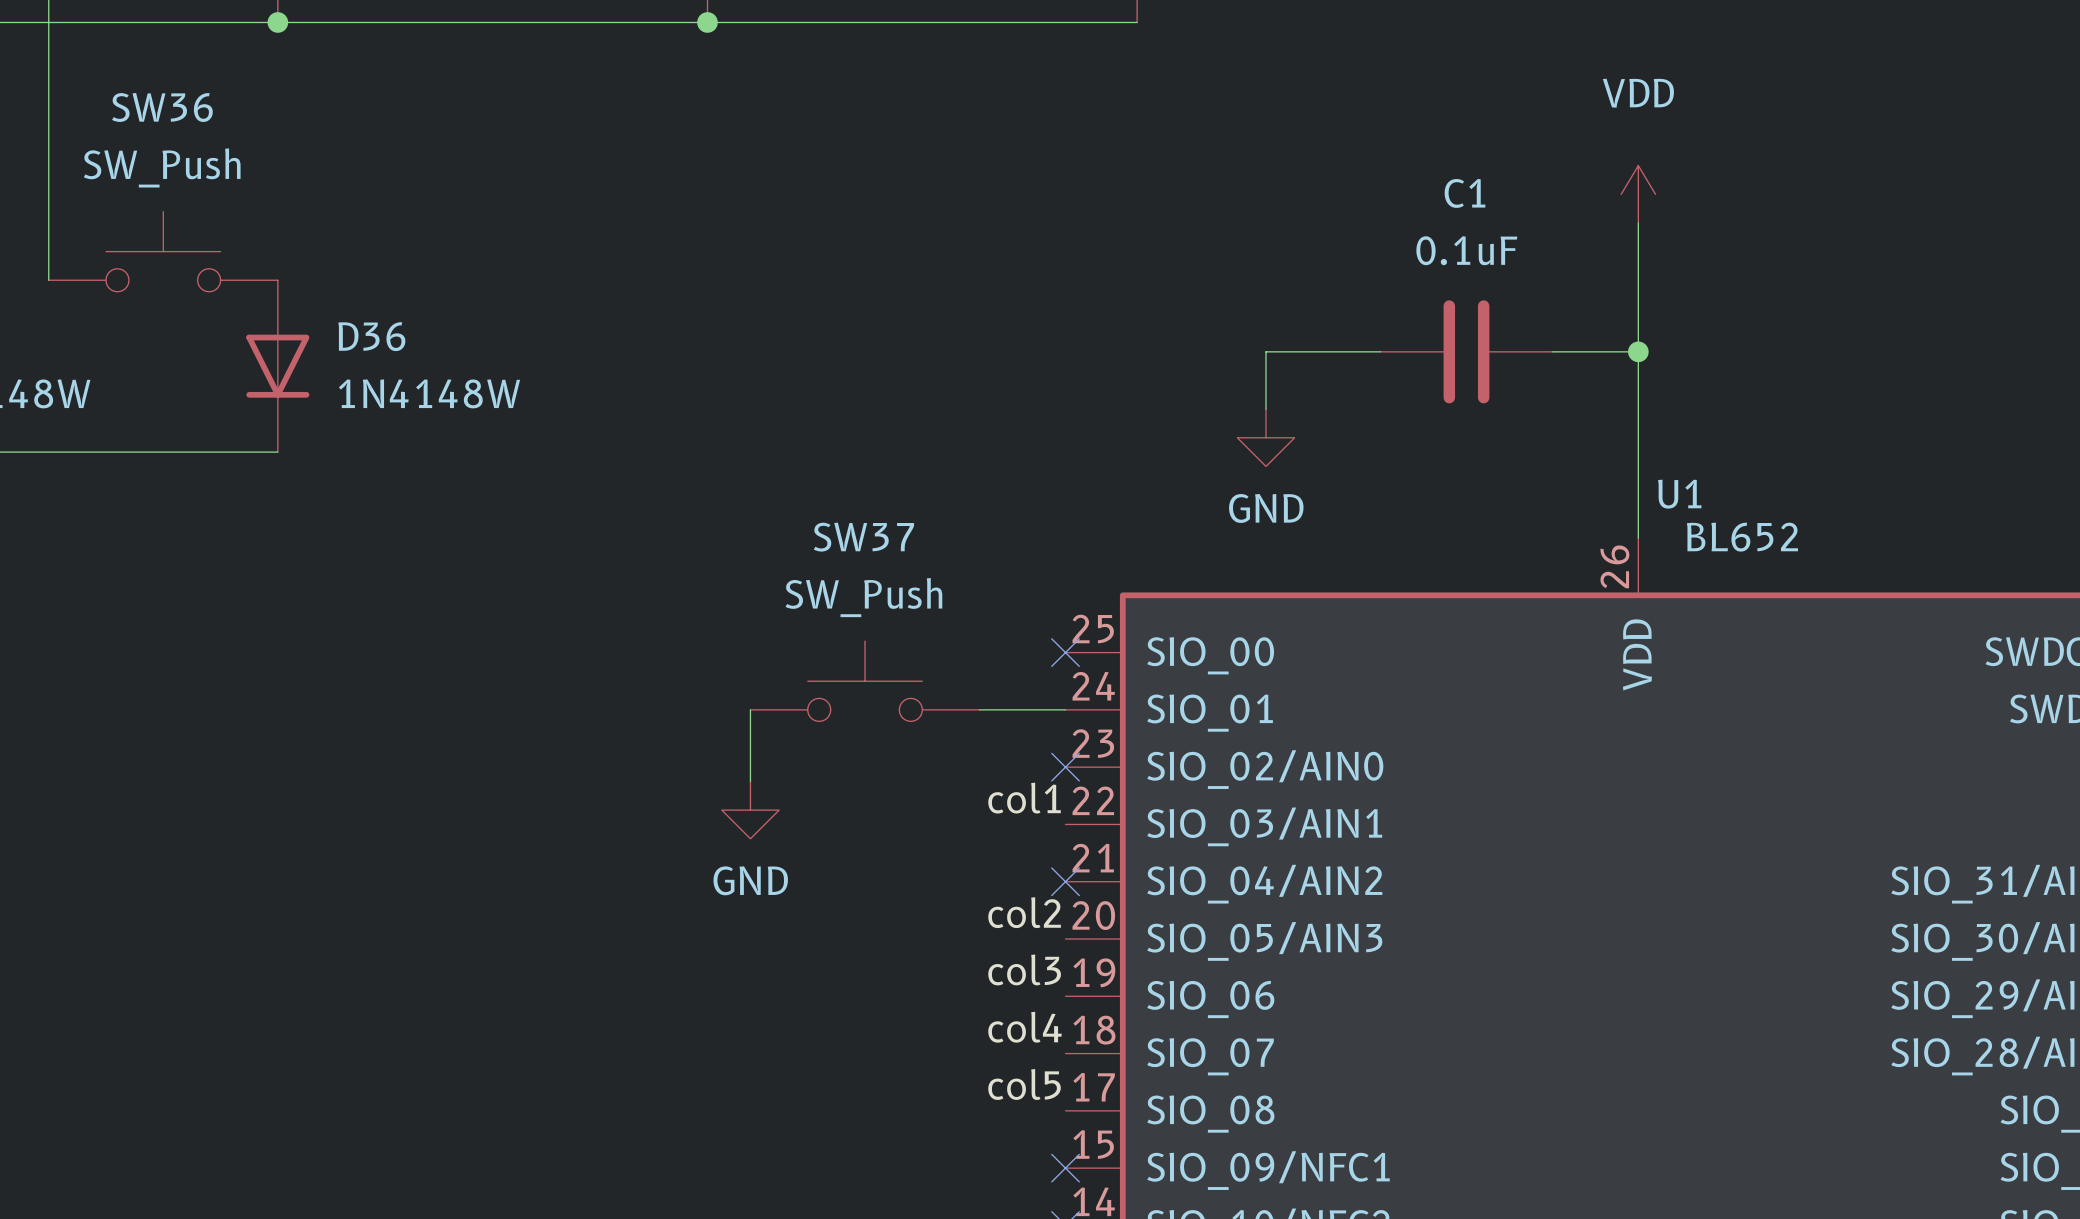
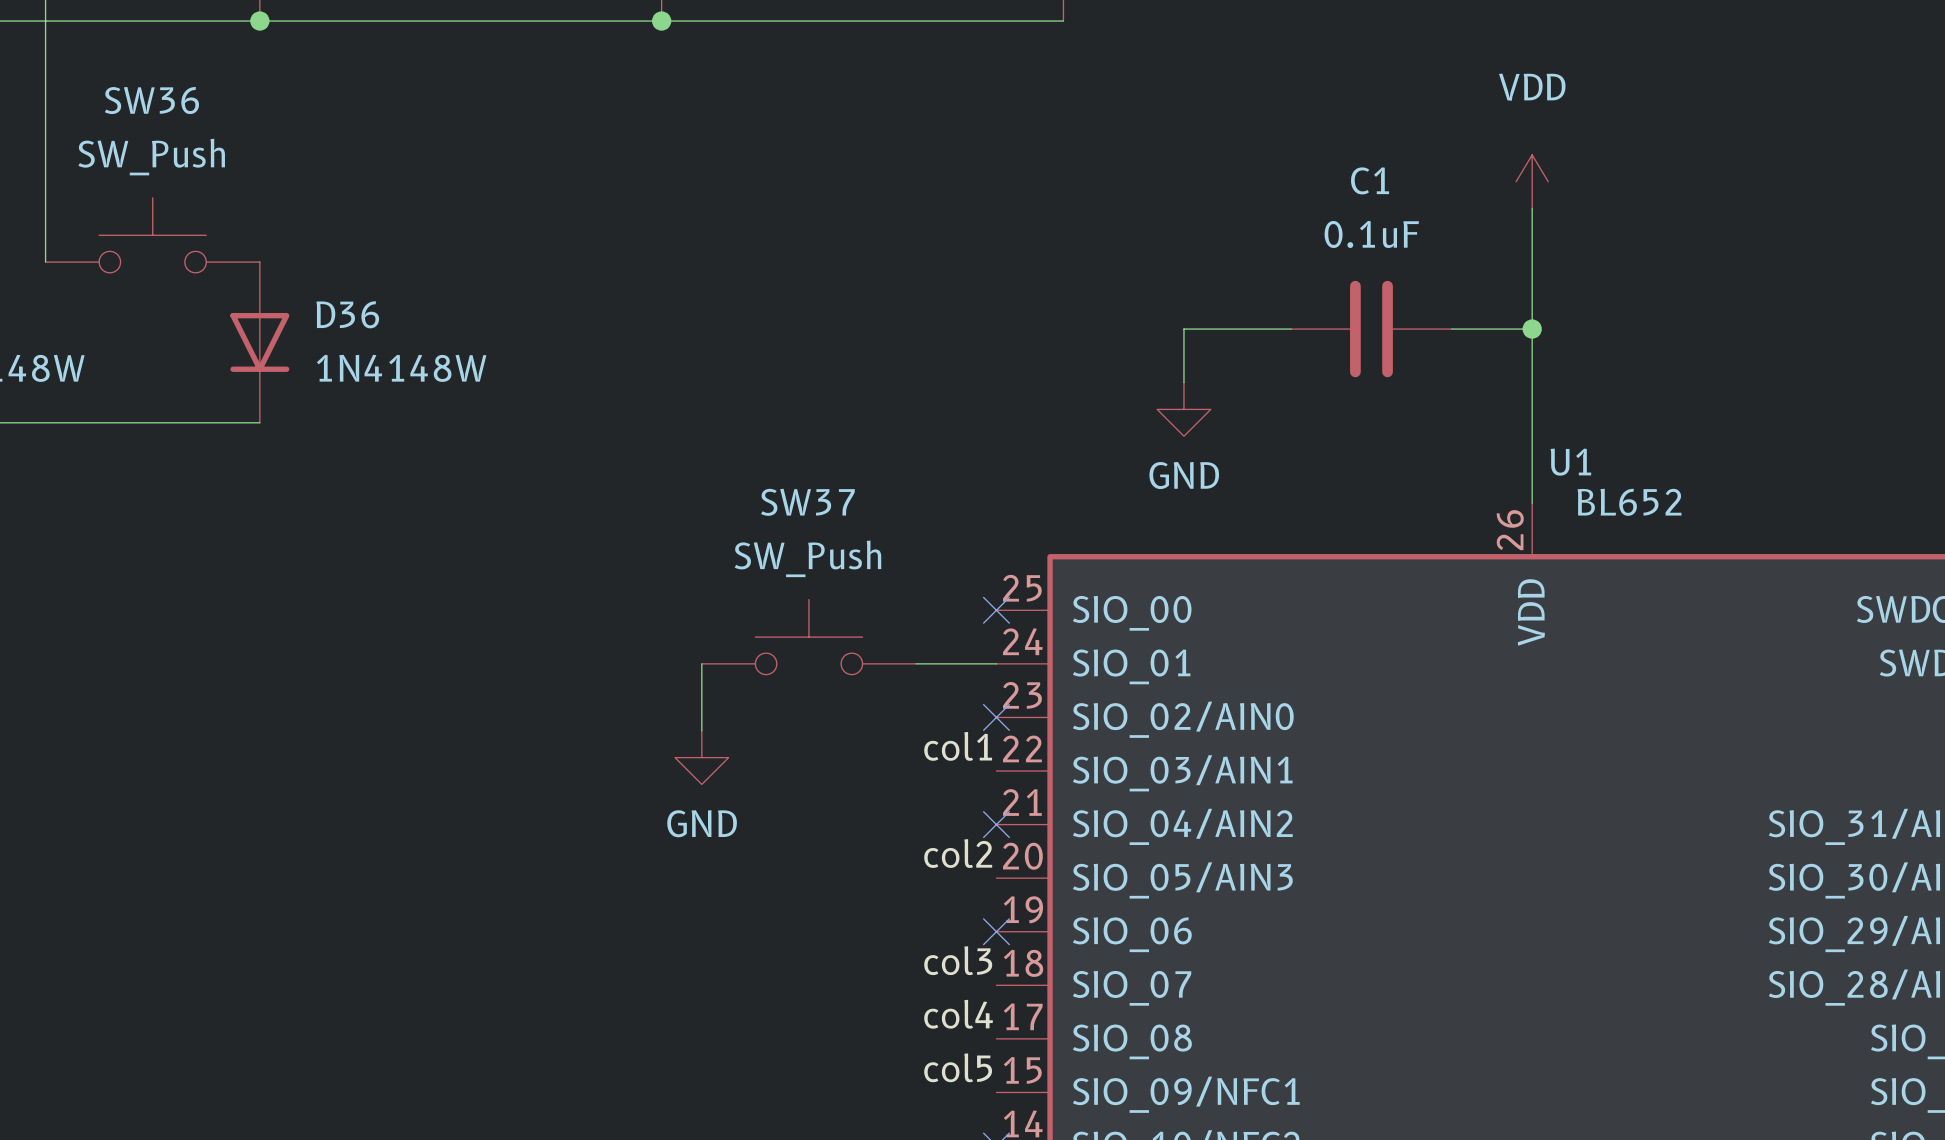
label: col3 (1024, 969) -> none
no-connect mark: none -> (996, 931)
label: col4 (1025, 1027) -> col3 (958, 960)
label: col5 (1024, 1084) -> col4 (958, 1014)
label: none -> col5 (958, 1067)
no-connect mark: (1065, 1168) -> none

